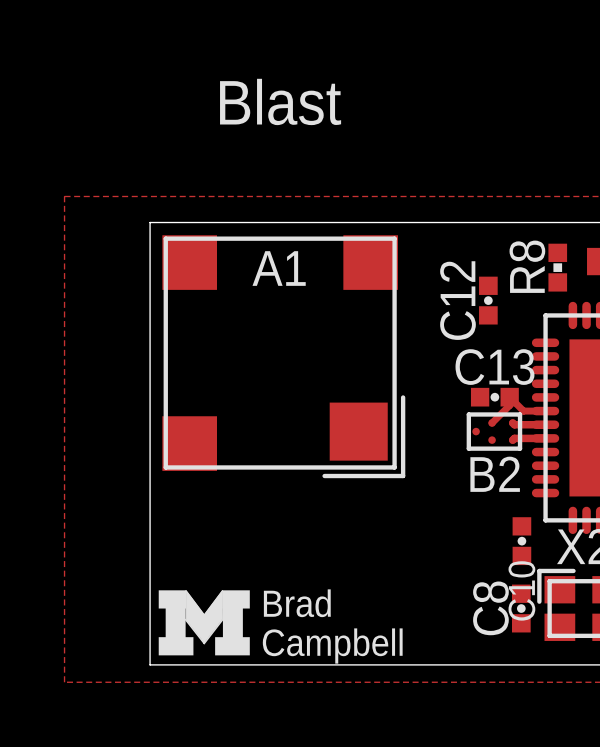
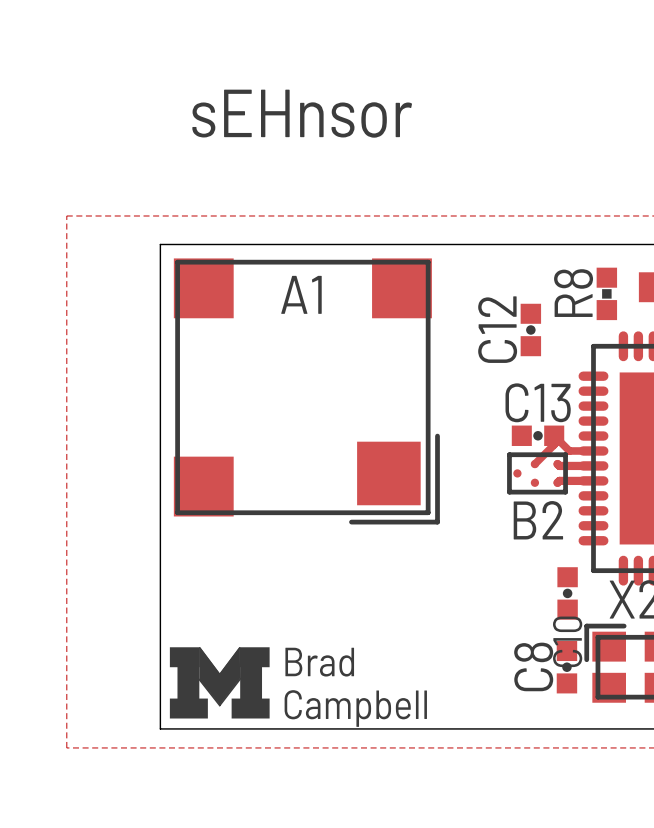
text: Blast (280, 101) -> sEHnsor (302, 113)

